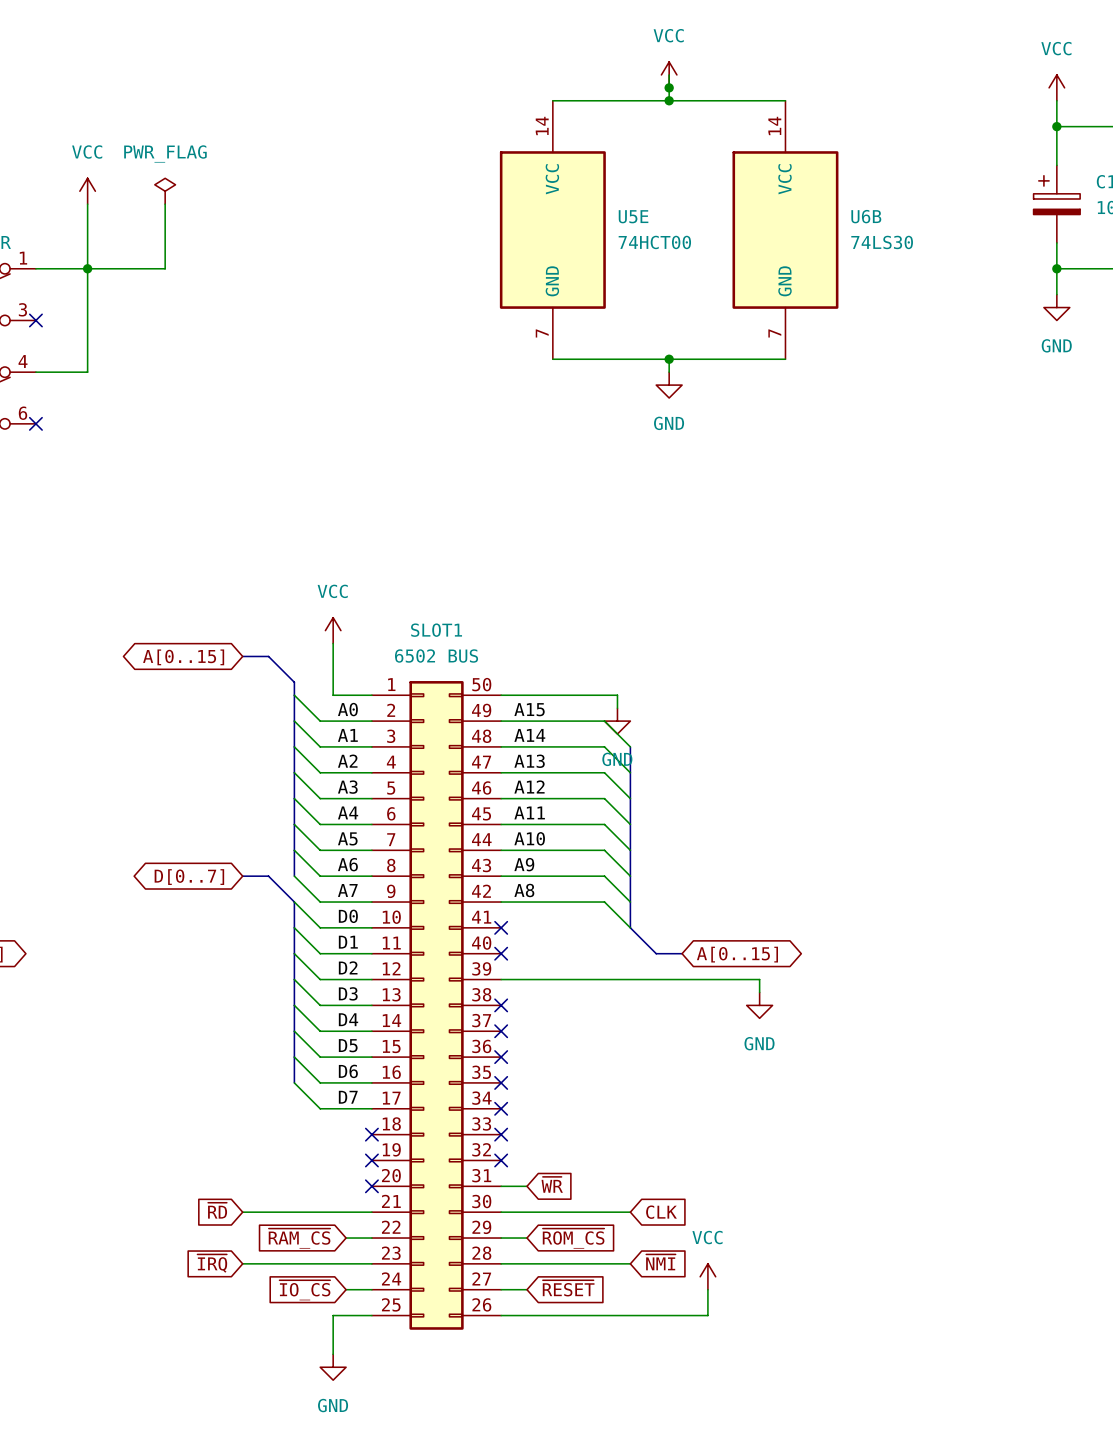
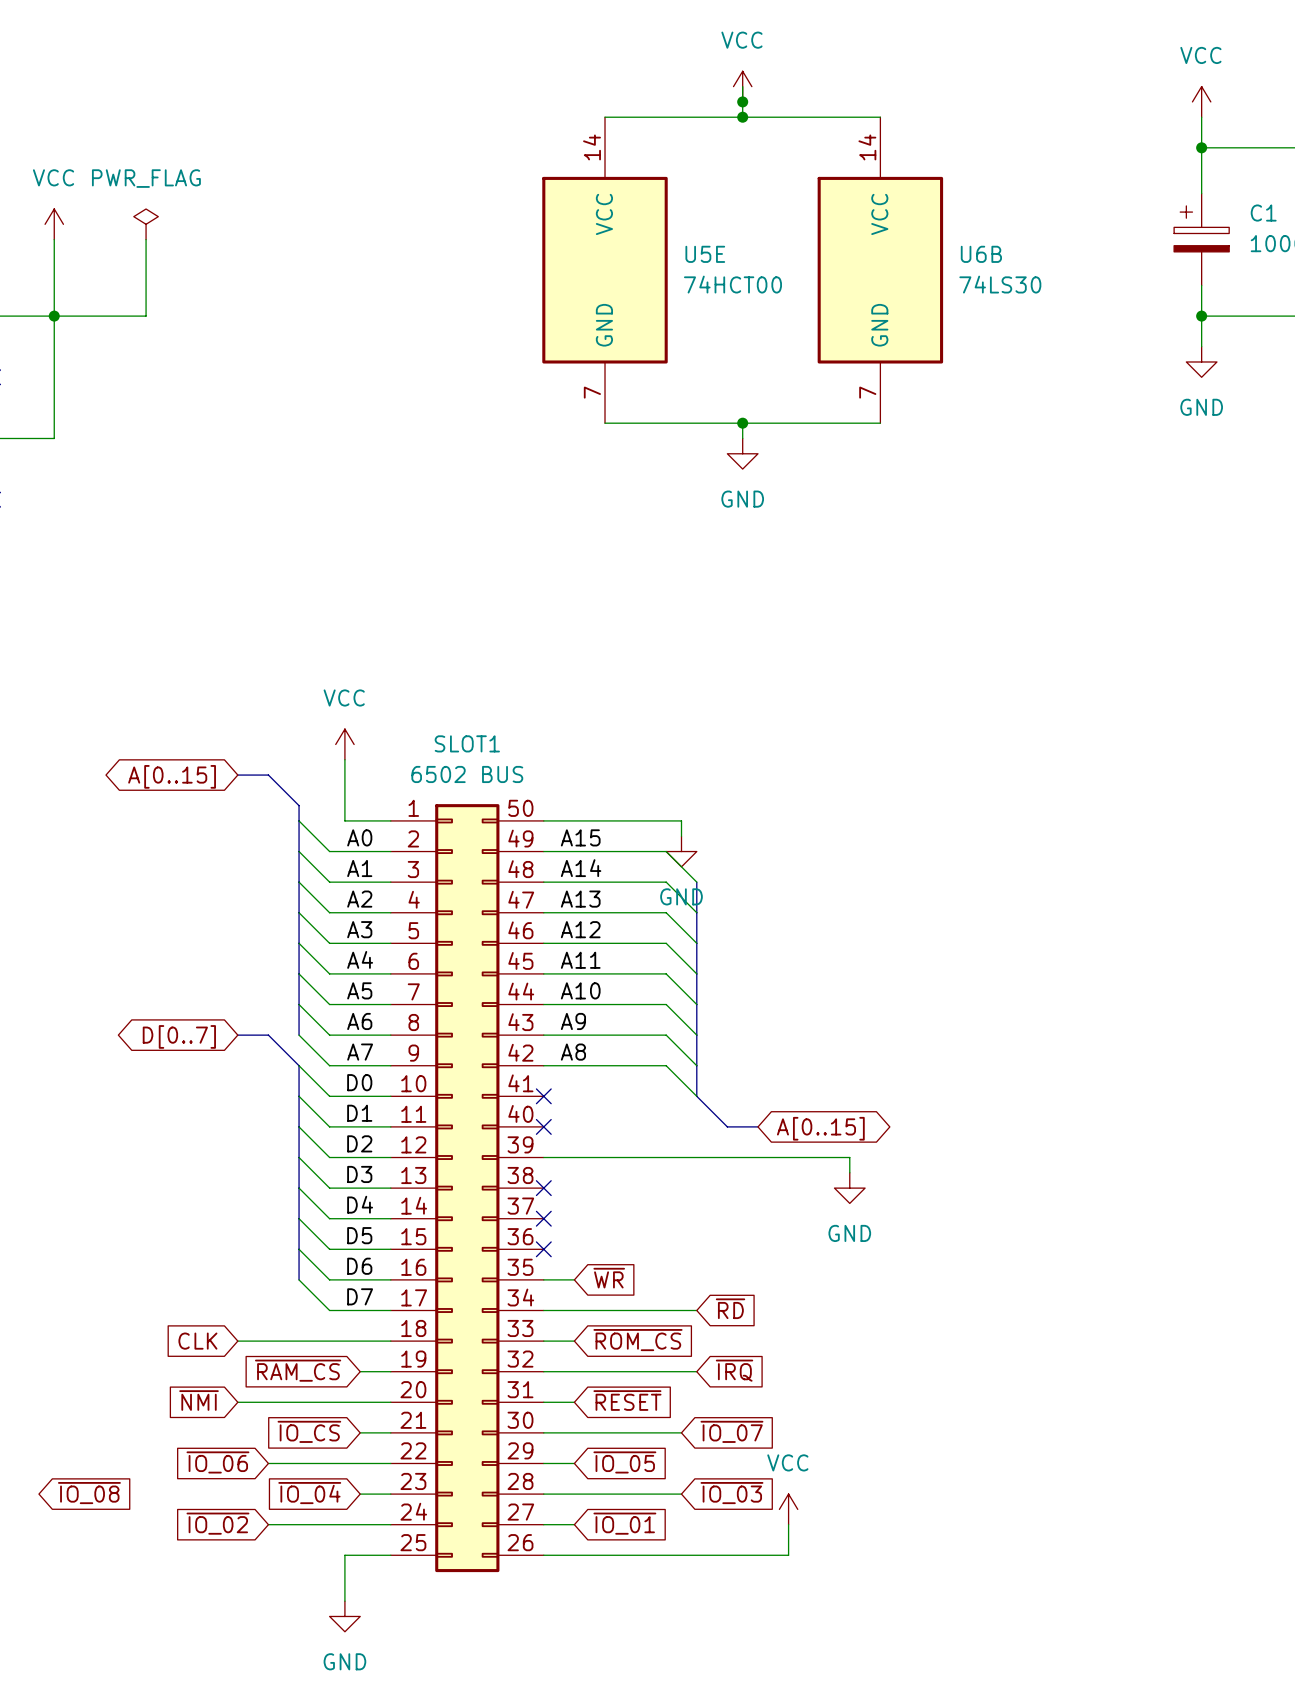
global label: none -> ~{WR} (609, 1278)
wire: none -> (543, 1279) (574, 1279)
no-connect mark: (501, 1082) -> none
global label: none -> ~{RD} (730, 1308)
wire: none -> (543, 1310) (696, 1310)
no-connect mark: (501, 1108) -> none
global label: none -> CLK (197, 1341)
wire: none -> (237, 1341) (390, 1341)
no-connect mark: (371, 1134) -> none
wire: none -> (543, 1341) (574, 1341)
no-connect mark: (501, 1134) -> none
global label: none -> ~{ROM_CS} (637, 1340)
wire: none -> (360, 1371) (390, 1371)
no-connect mark: (371, 1160) -> none
wire: none -> (543, 1371) (696, 1371)
no-connect mark: (501, 1160) -> none
global label: none -> ~{IRQ} (734, 1370)
global label: none -> ~{NMI} (199, 1400)
global label: ~{WR} (552, 1184) -> ~{RESET} (627, 1400)
wire: none -> (237, 1402) (390, 1402)
no-connect mark: (371, 1186) -> none
global label: ~{RD} (217, 1210) -> none
wire: (242, 1212) (346, 1212) -> none
wire: (617, 1212) (630, 1212) -> none
global label: none -> ~{IO_07} (731, 1431)
global label: CLK (661, 1212) -> none
global label: none -> ~{IO_06} (217, 1462)
wire: none -> (268, 1463) (360, 1463)
global label position: ~{RAM_CS} (299, 1238) -> ~{RAM_CS} (298, 1370)
global label: ~{ROM_CS} (573, 1238) -> ~{IO_05} (624, 1462)
global label: ~{NMI} (660, 1262) -> none
global label: ~{IRQ} (212, 1263) -> none
wire: (242, 1263) (346, 1263) -> none
wire: (617, 1263) (630, 1263) -> none
global label: none -> ~{IO_08} (89, 1493)
global label: none -> ~{IO_04} (309, 1493)
global label: none -> ~{IO_03} (731, 1493)
global label: ~{RESET} (568, 1288) -> ~{IO_01} (624, 1523)
wire: none -> (268, 1524) (360, 1524)
global label: none -> ~{IO_02} (217, 1523)
global label position: ~{IO_CS} (304, 1290) -> ~{IO_CS} (309, 1431)

